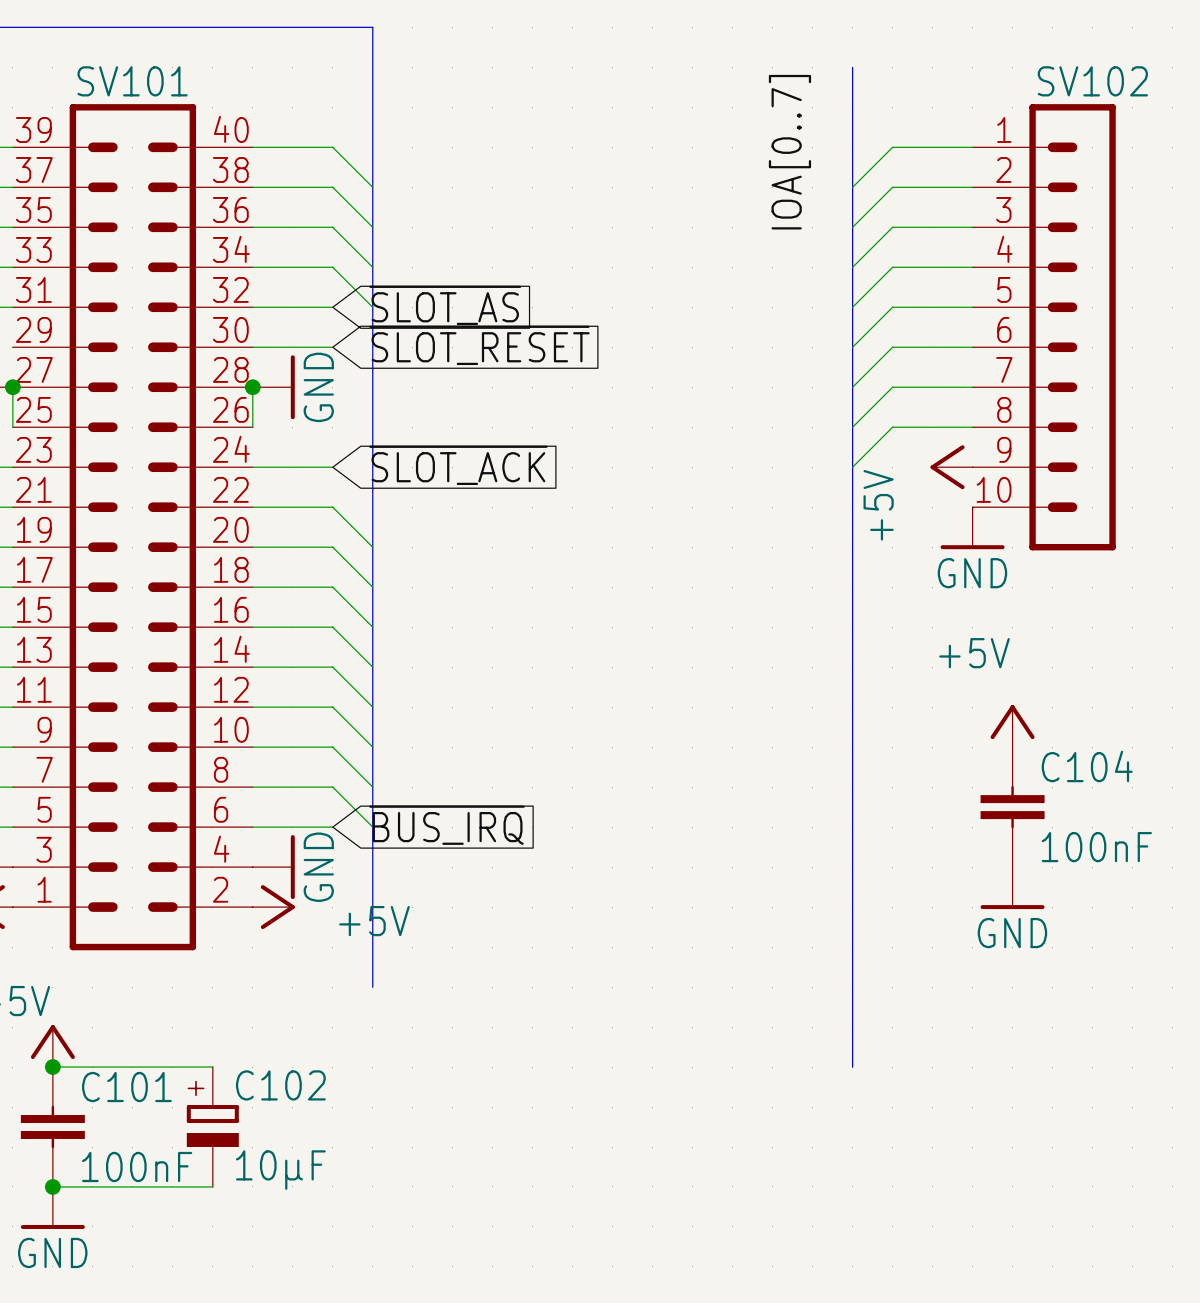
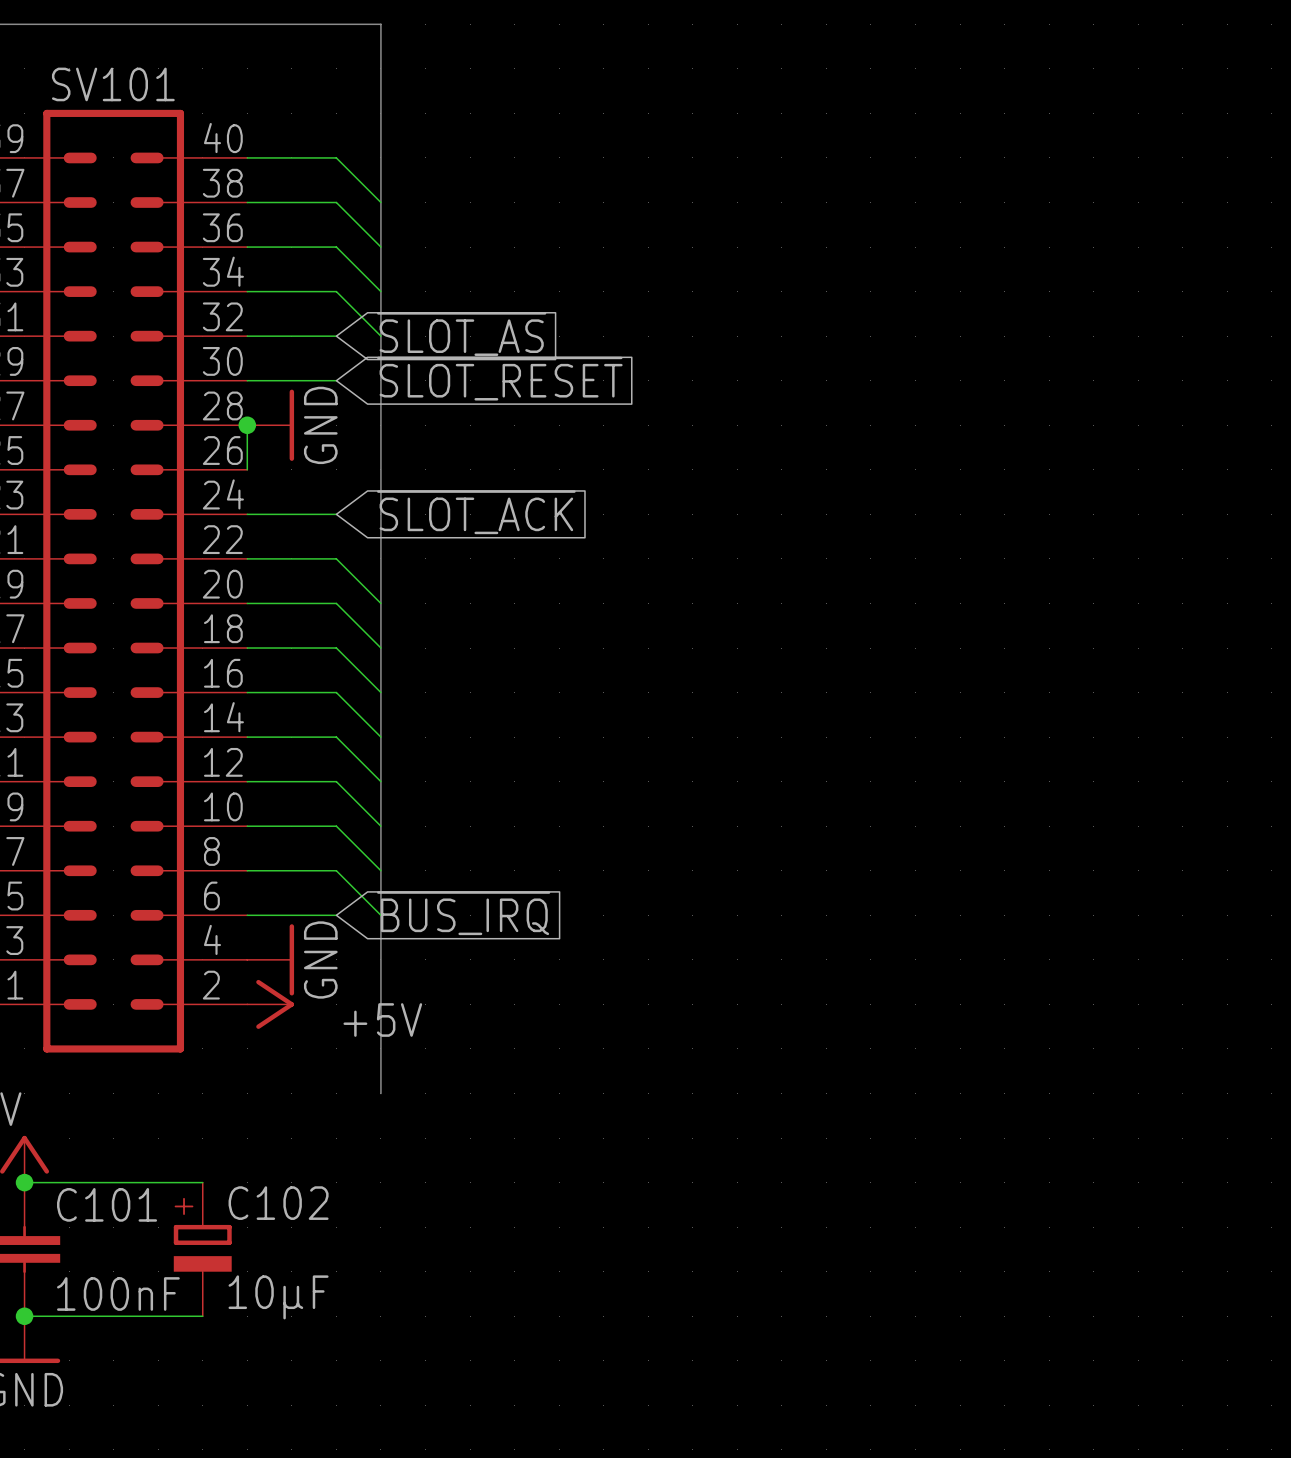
bus: (852, 67) (852, 1067) -> none
wire: (972, 147) (892, 147) (852, 187) -> none
label: IOA[0..7] (789, 152) -> none
wire: (972, 187) (892, 187) (852, 227) -> none
wire: (972, 227) (892, 227) (852, 267) -> none
wire: (972, 267) (892, 267) (852, 307) -> none
wire: (972, 307) (892, 307) (852, 347) -> none
SV102: (1044, 327) -> none
wire: (972, 347) (892, 347) (852, 387) -> none
wire: (972, 387) (892, 387) (852, 427) -> none
wire: (972, 427) (892, 427) (852, 467) -> none
power symbol: +5V (951, 467) -> none
power symbol: GND (972, 528) -> none
power symbol: +5V (1012, 726) -> none
C104: 100nF (1012, 807) -> none
power symbol: GND (1012, 888) -> none

